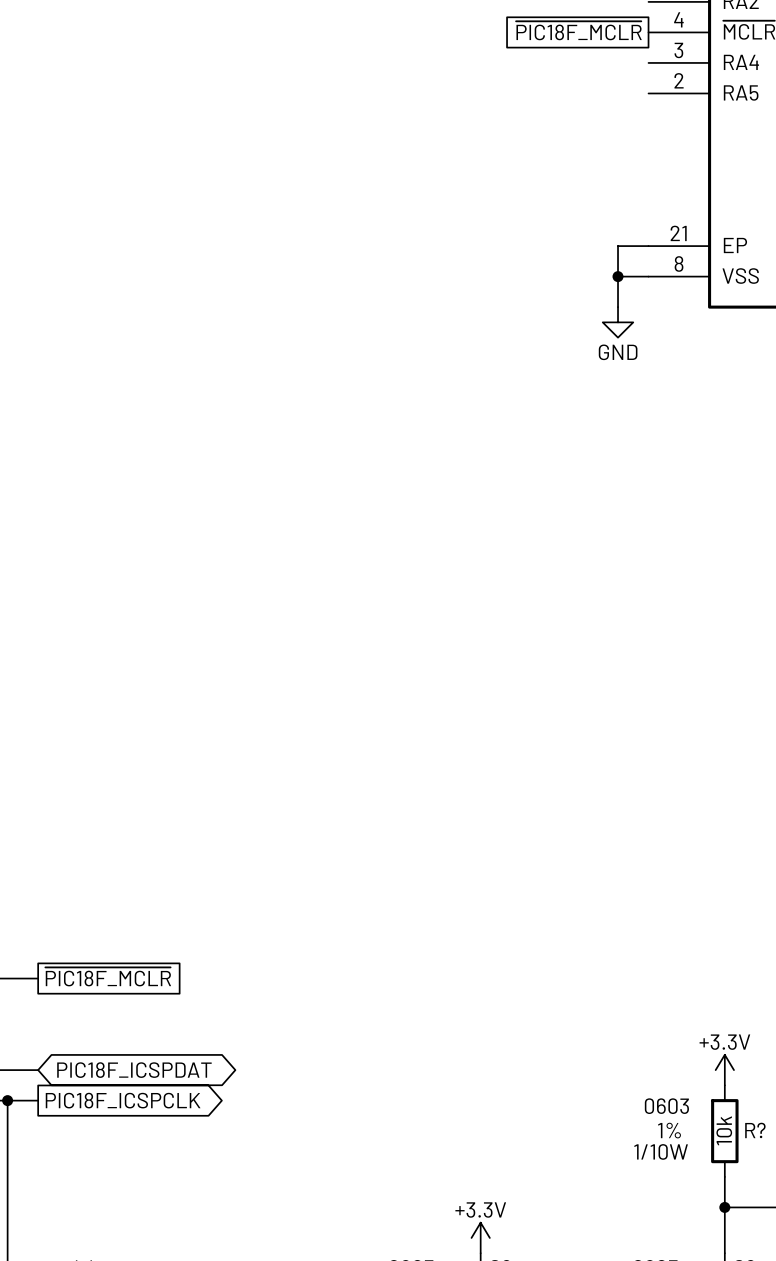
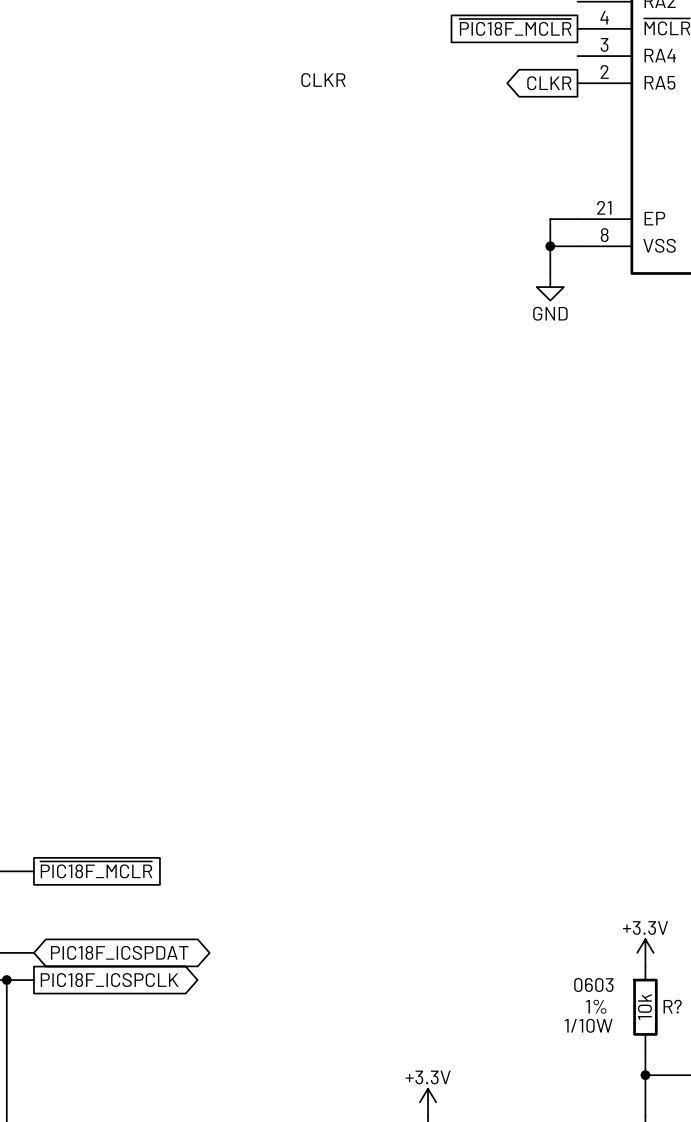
text: none -> CLKR (323, 80)
global label: none -> CLKR (549, 83)

